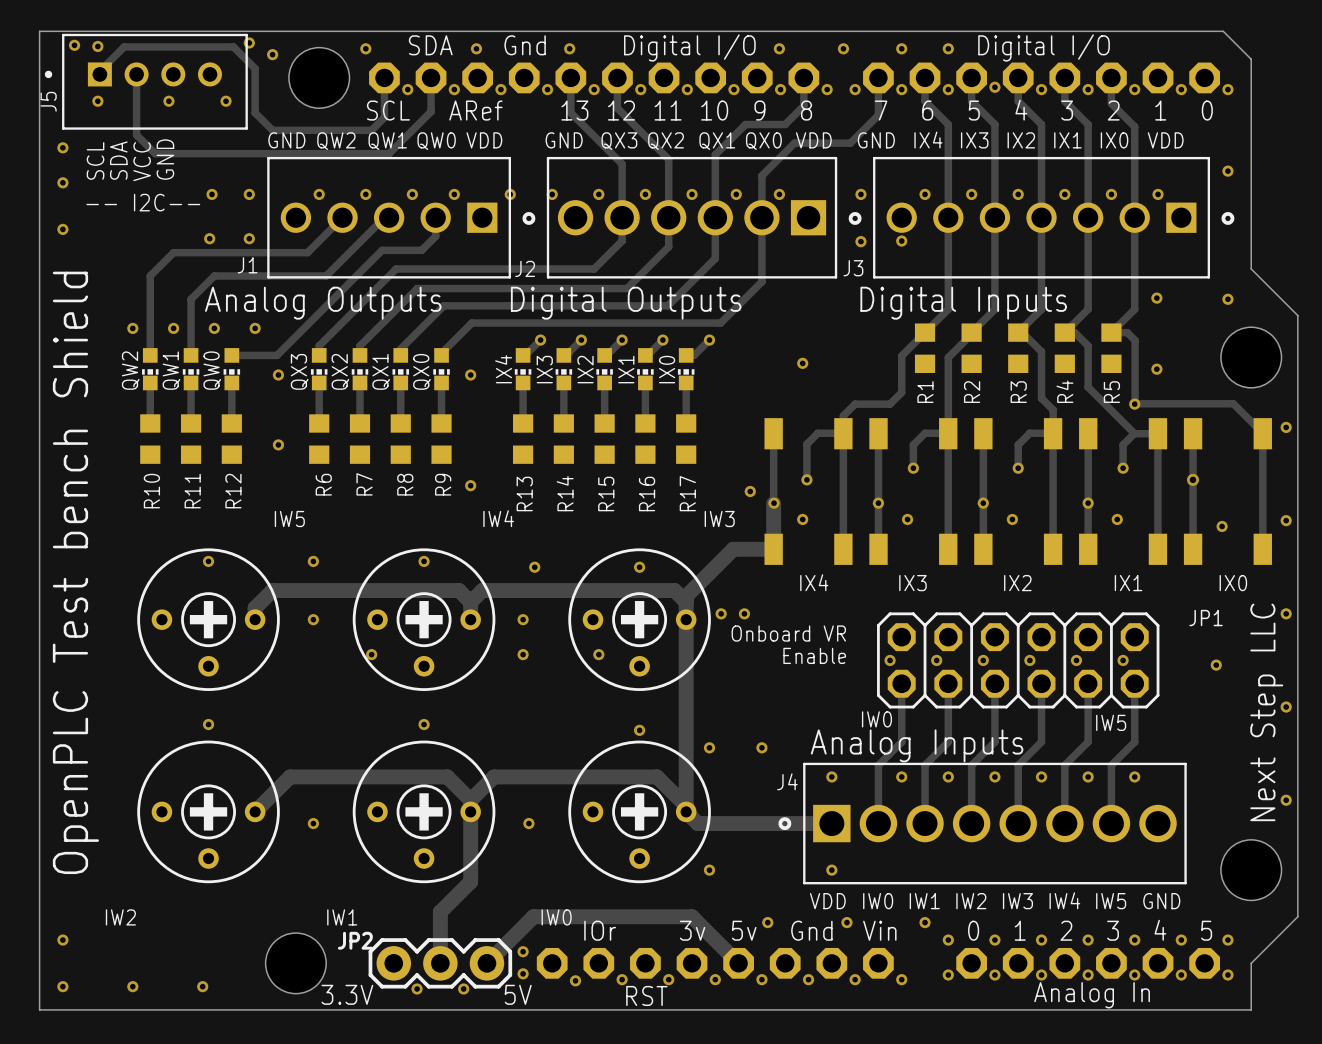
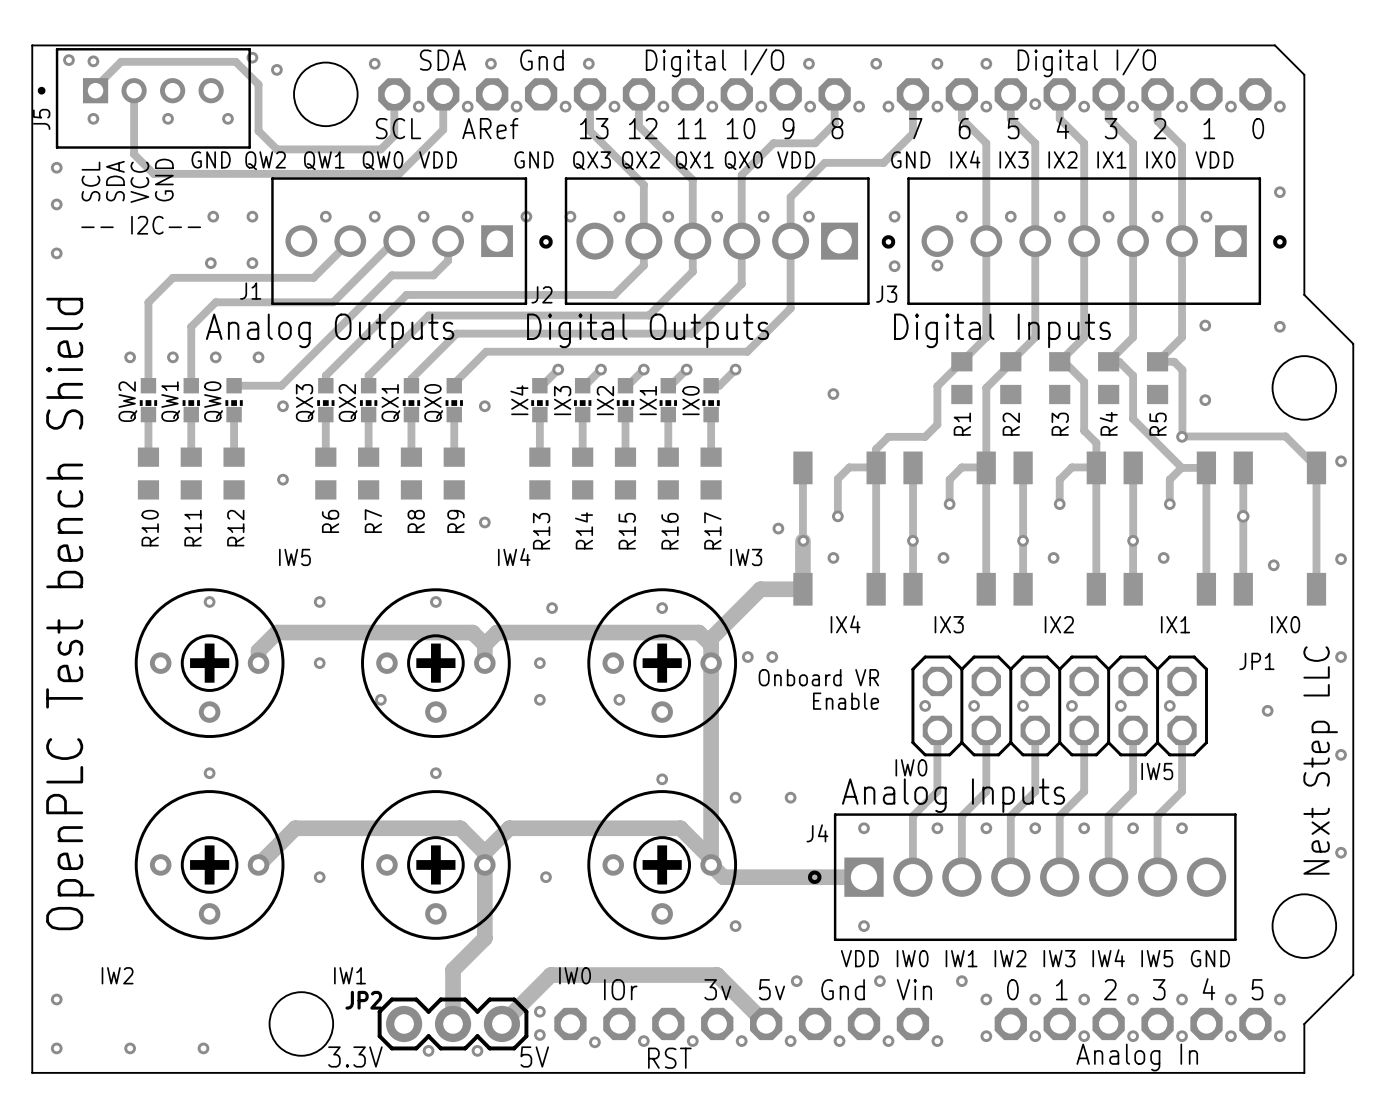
text position: GND (286, 140) -> GND (211, 159)
text position: VDD (484, 140) -> VDD (438, 159)
text position: GND (564, 140) -> GND (534, 159)
text position: VDD (813, 140) -> VDD (796, 159)
text position: QW2 (336, 141) -> QW2 (265, 160)
text position: QW1 (387, 141) -> QW1 (324, 160)
text position: QW0 (436, 141) -> QW0 (383, 160)
text: none -> QX3 (592, 160)
text: QX3 (619, 141) -> QX2 (641, 160)
text: QX2 (666, 141) -> QX1 (694, 160)
text: QX1 (717, 141) -> QX0 (743, 160)
text: QX0 (763, 141) -> none

